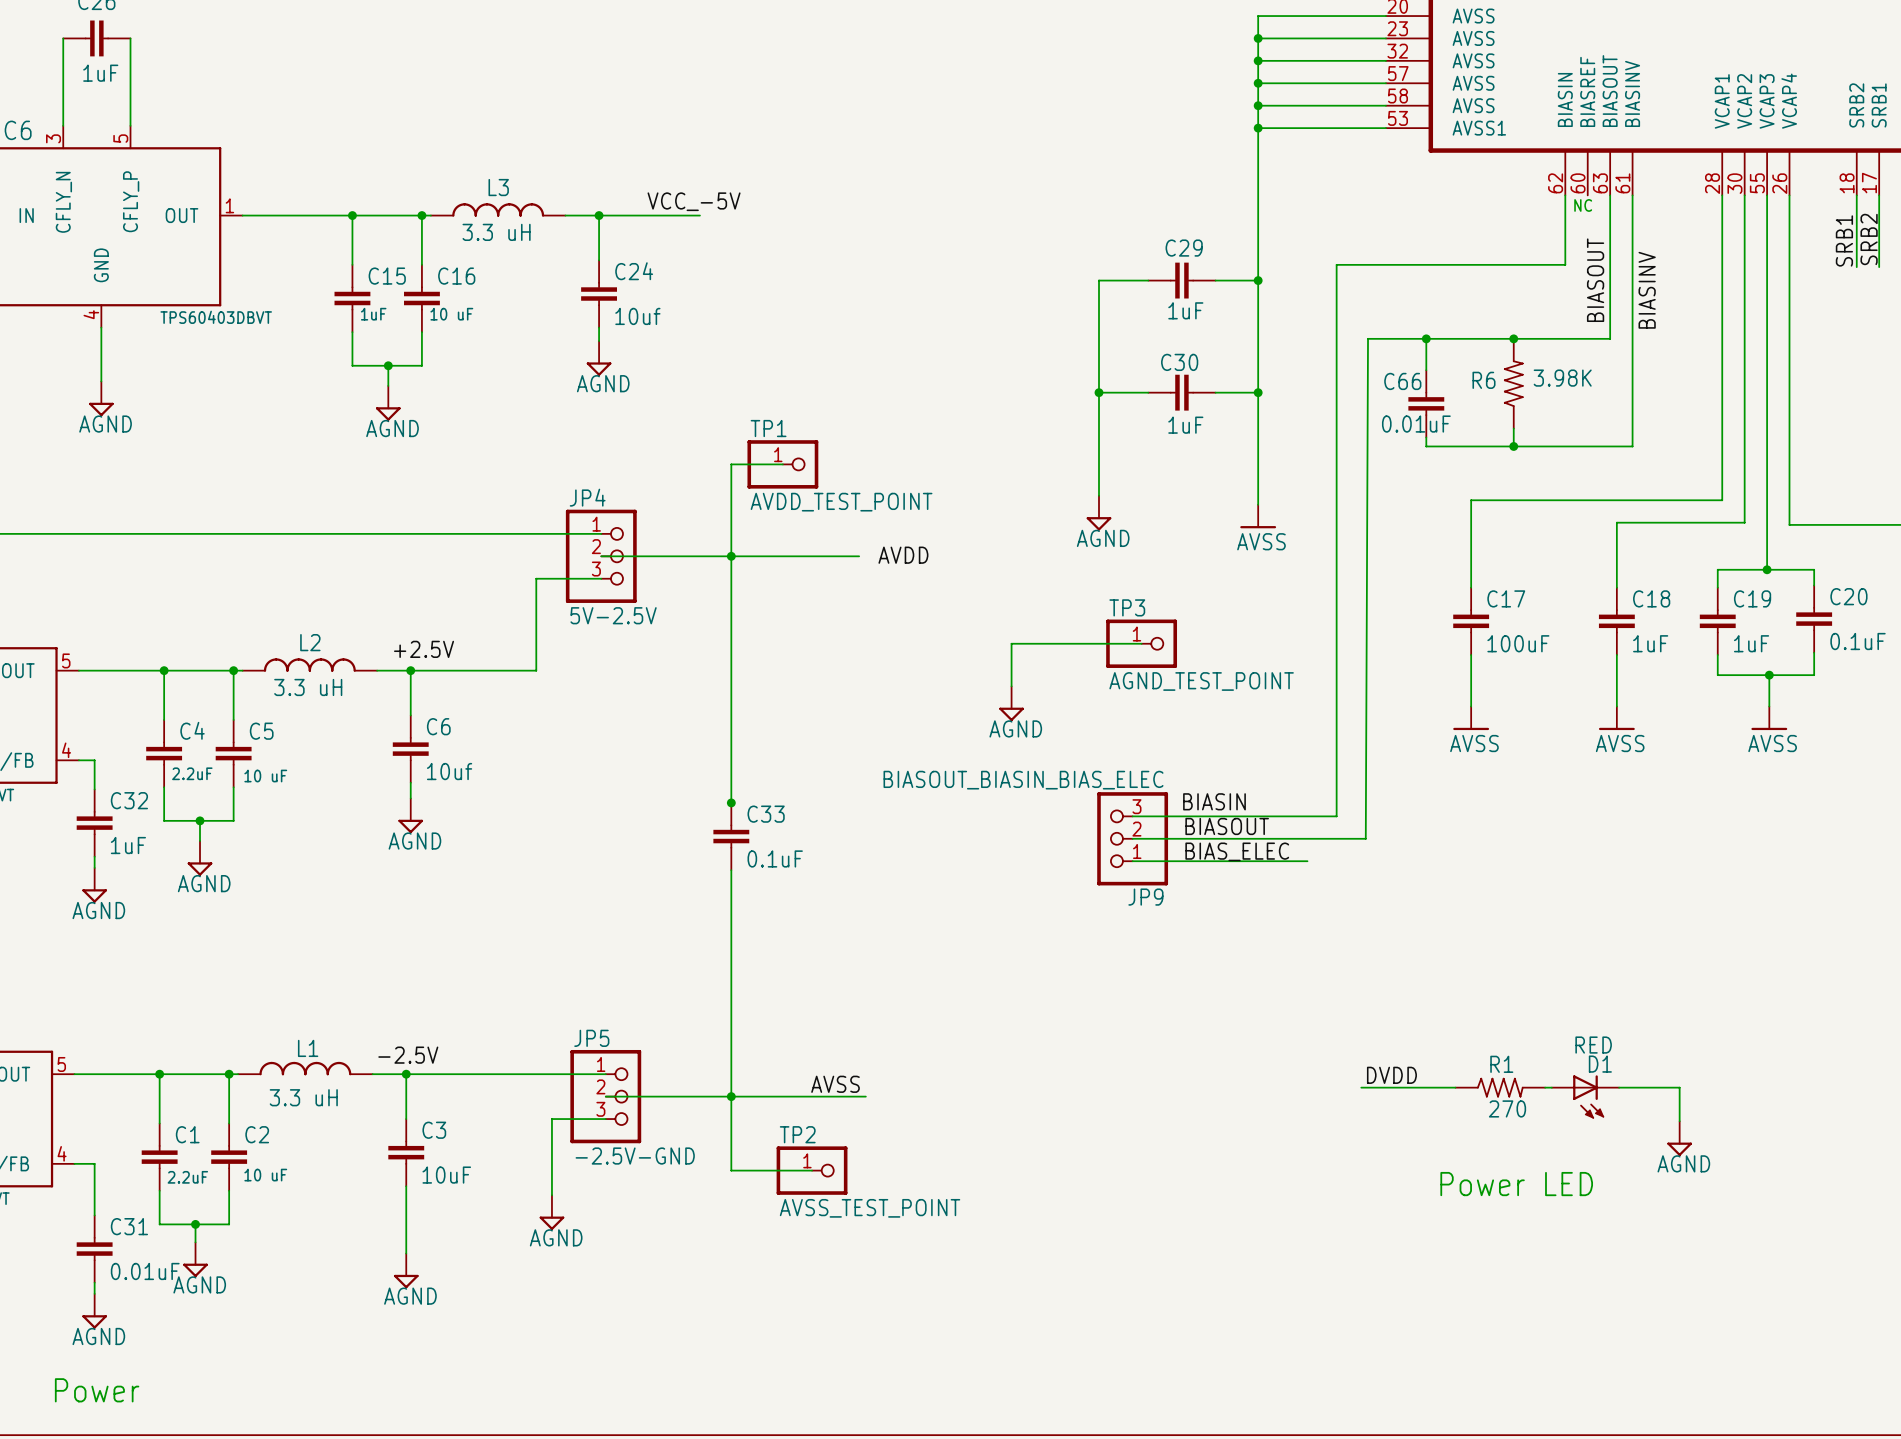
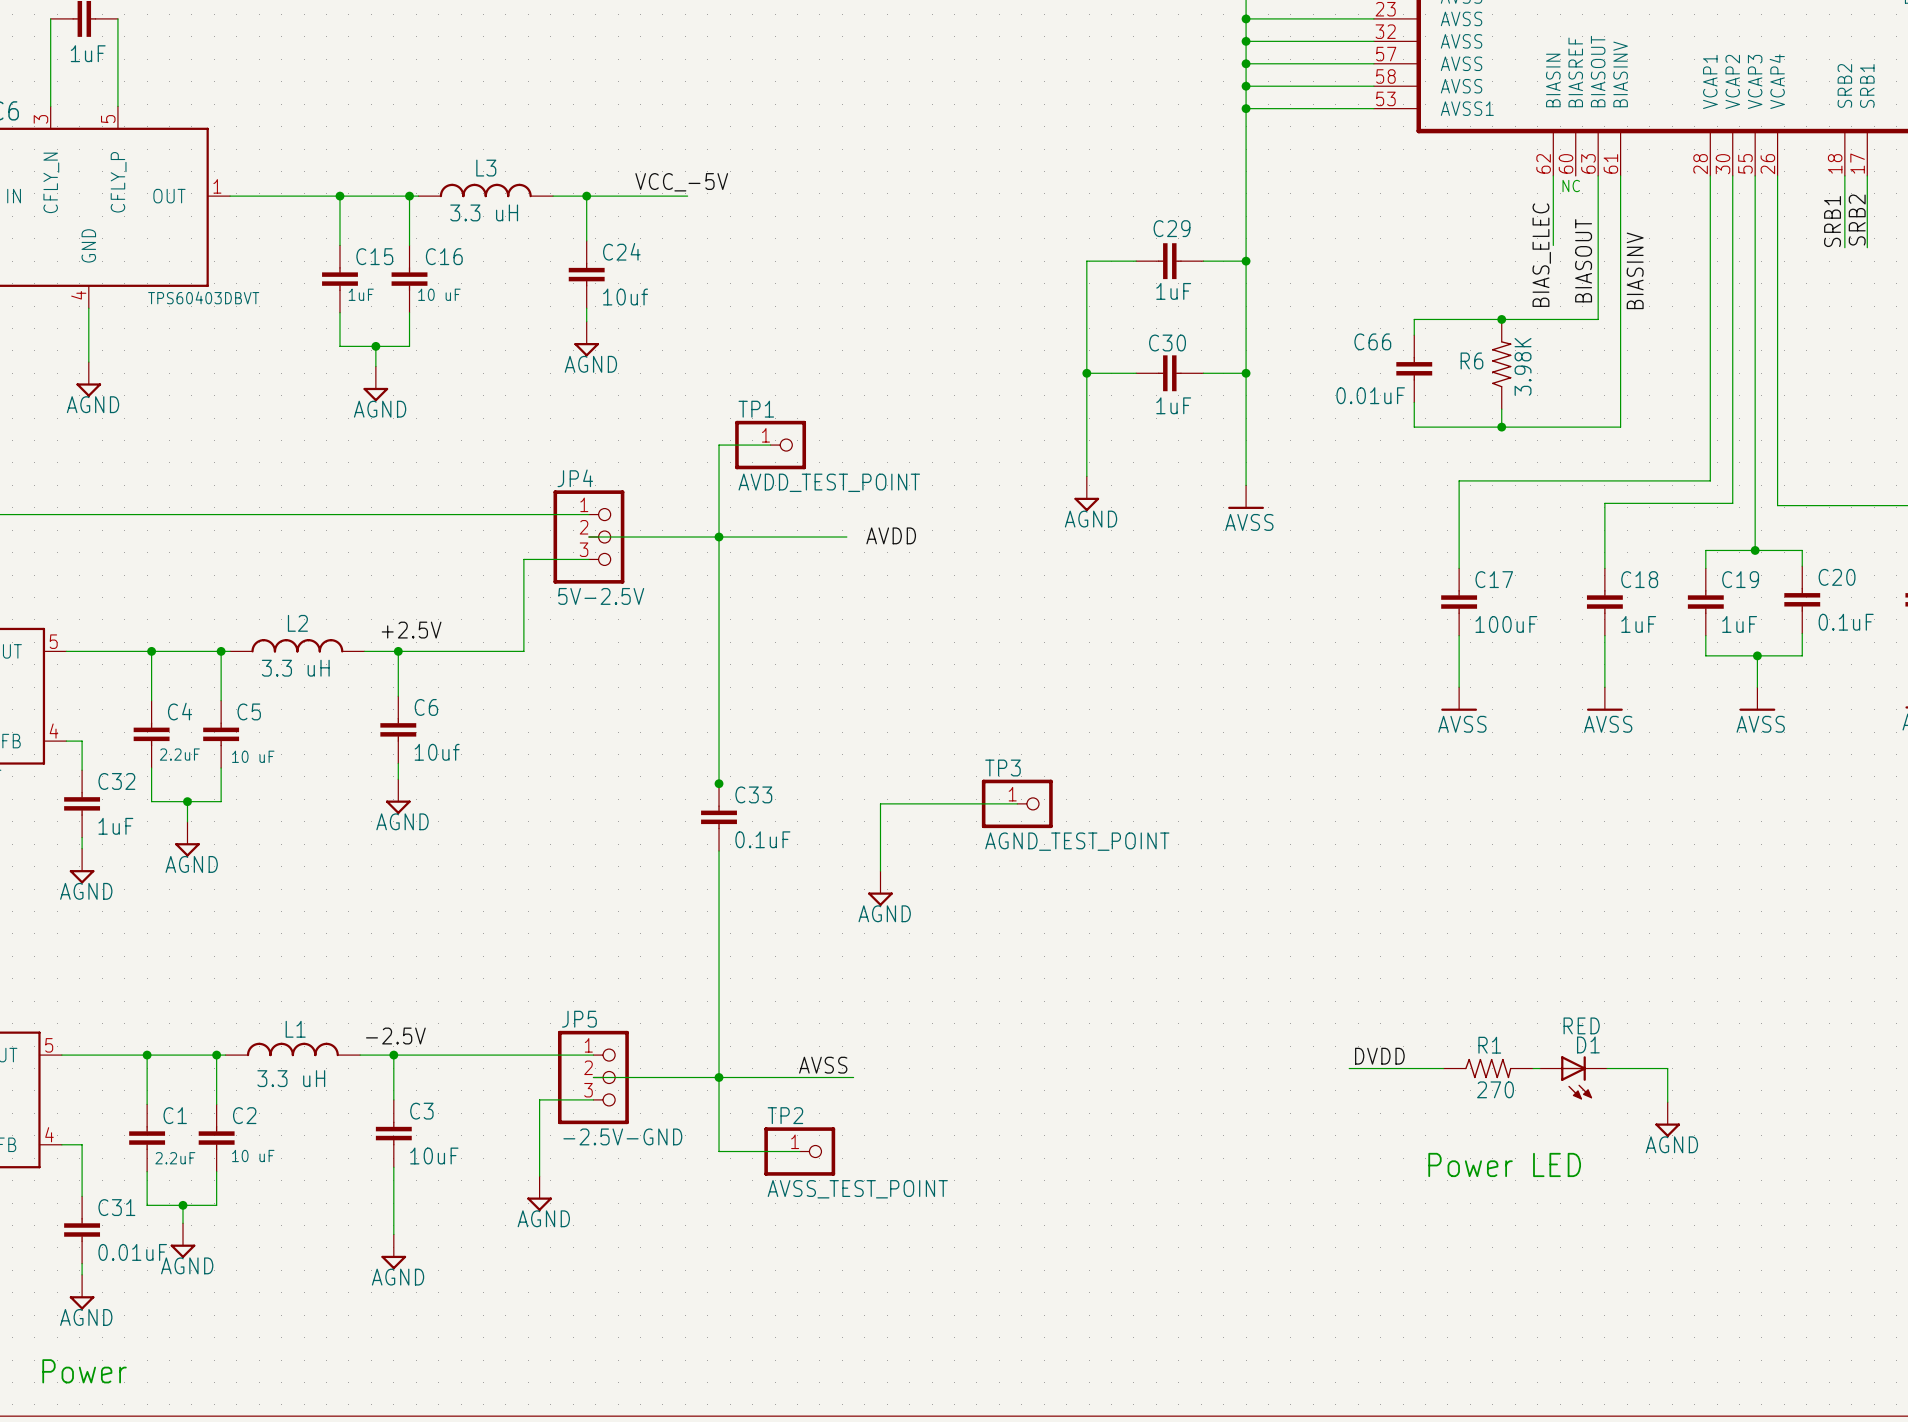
wire: (1565, 264) (1336, 264) (1336, 816) (1132, 816) -> none
label: none -> BIAS_ELEC (1541, 255)
wire: (1426, 338) (1368, 338) (1365, 838) (1132, 838) -> none
junction: (1426, 338) -> none
R6 value rotation: 0° (1562, 378) -> 90° counterclockwise (1523, 366)
C66 name position: C66 (1402, 381) -> C66 (1372, 341)
C66 position: (1426, 403) -> (1414, 368)
C66 value position: 0.01uF (1416, 424) -> 0.01uF (1370, 395)
wire: (1141, 643) (1011, 643) (1011, 686) -> none
TP3 position: (1141, 643) -> (1017, 803)
power symbol: AGND (1011, 703) -> none
label: BIASIN (1214, 801) -> none
wire: none -> (1017, 803) (880, 803) (880, 871)
label: BIASOUT (1227, 826) -> none
JP9: BIASOUT_BIASIN_BIAS_ELEC (1132, 838) -> none
label: BIAS_ELEC (1237, 851) -> none
wire: (1132, 861) (1307, 861) -> none
power symbol: none -> AGND (880, 888)

